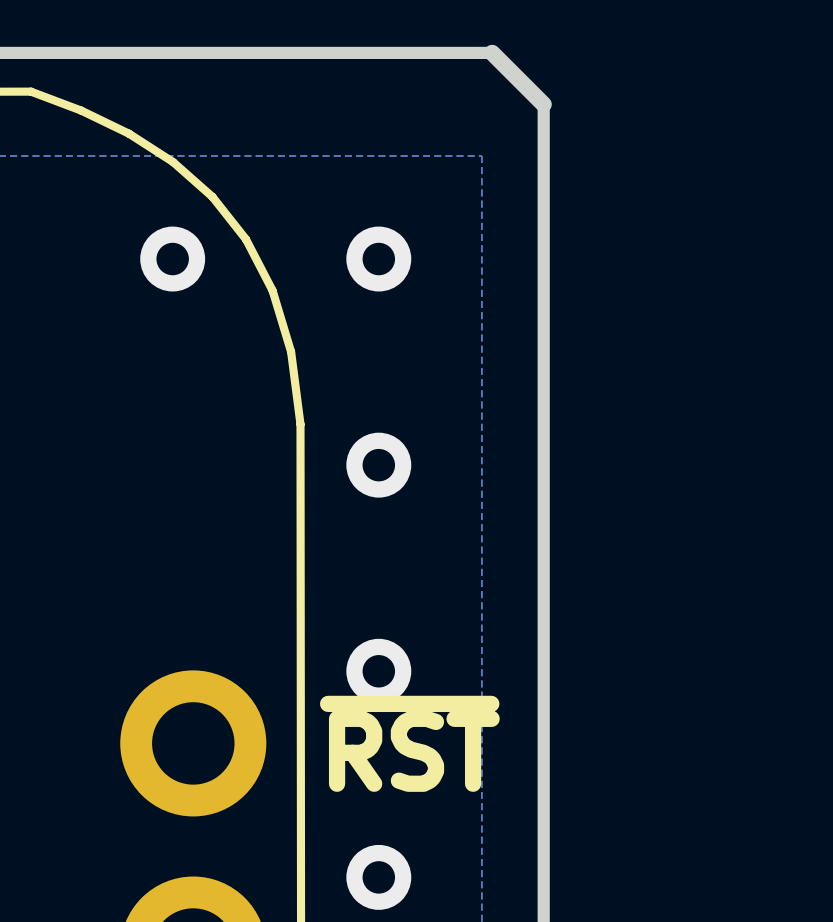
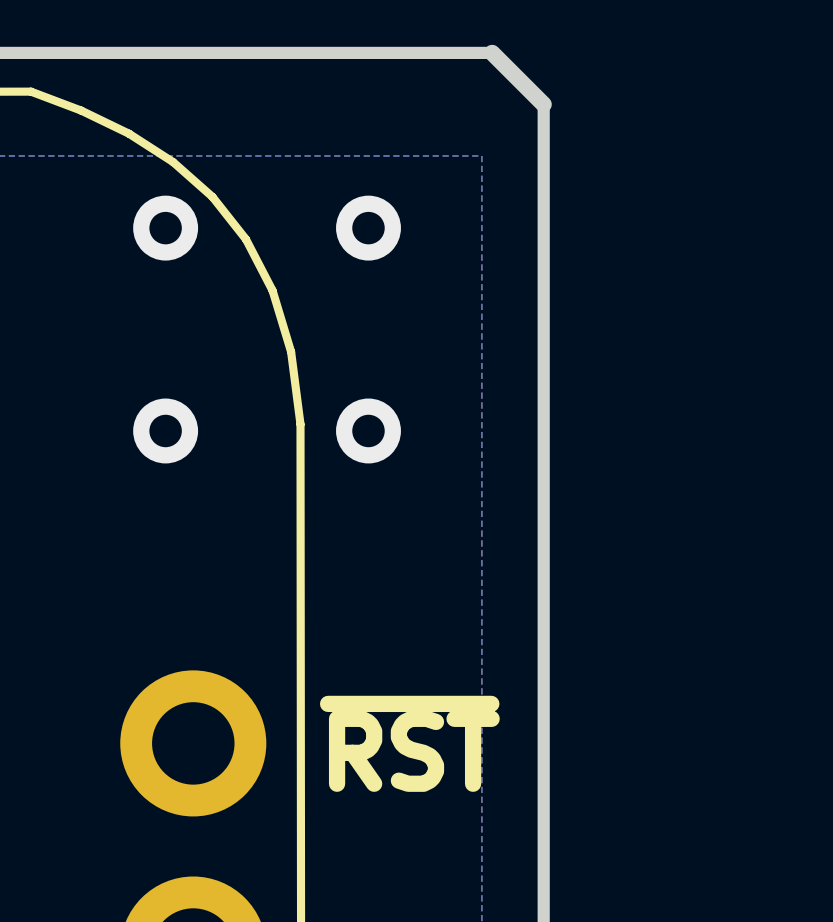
via position: (172, 259) -> (165, 228)
via position: (378, 259) -> (368, 228)
via: none -> (165, 430)
via position: (378, 465) -> (368, 430)
via: (378, 671) -> none
via: (378, 877) -> none

